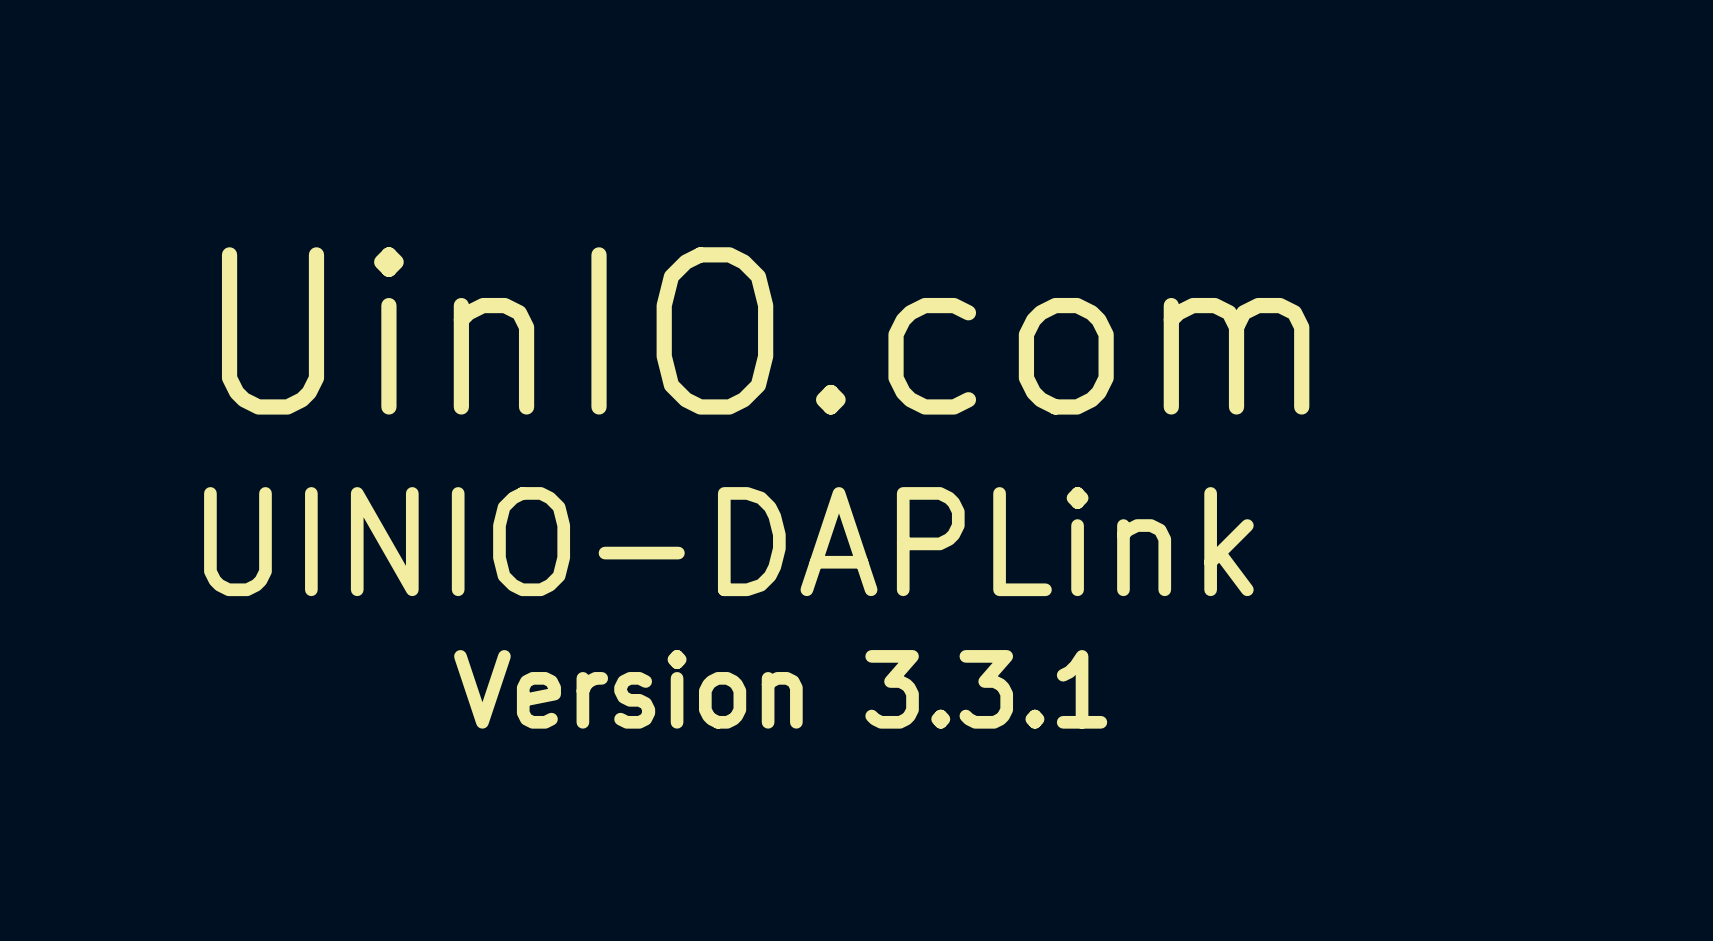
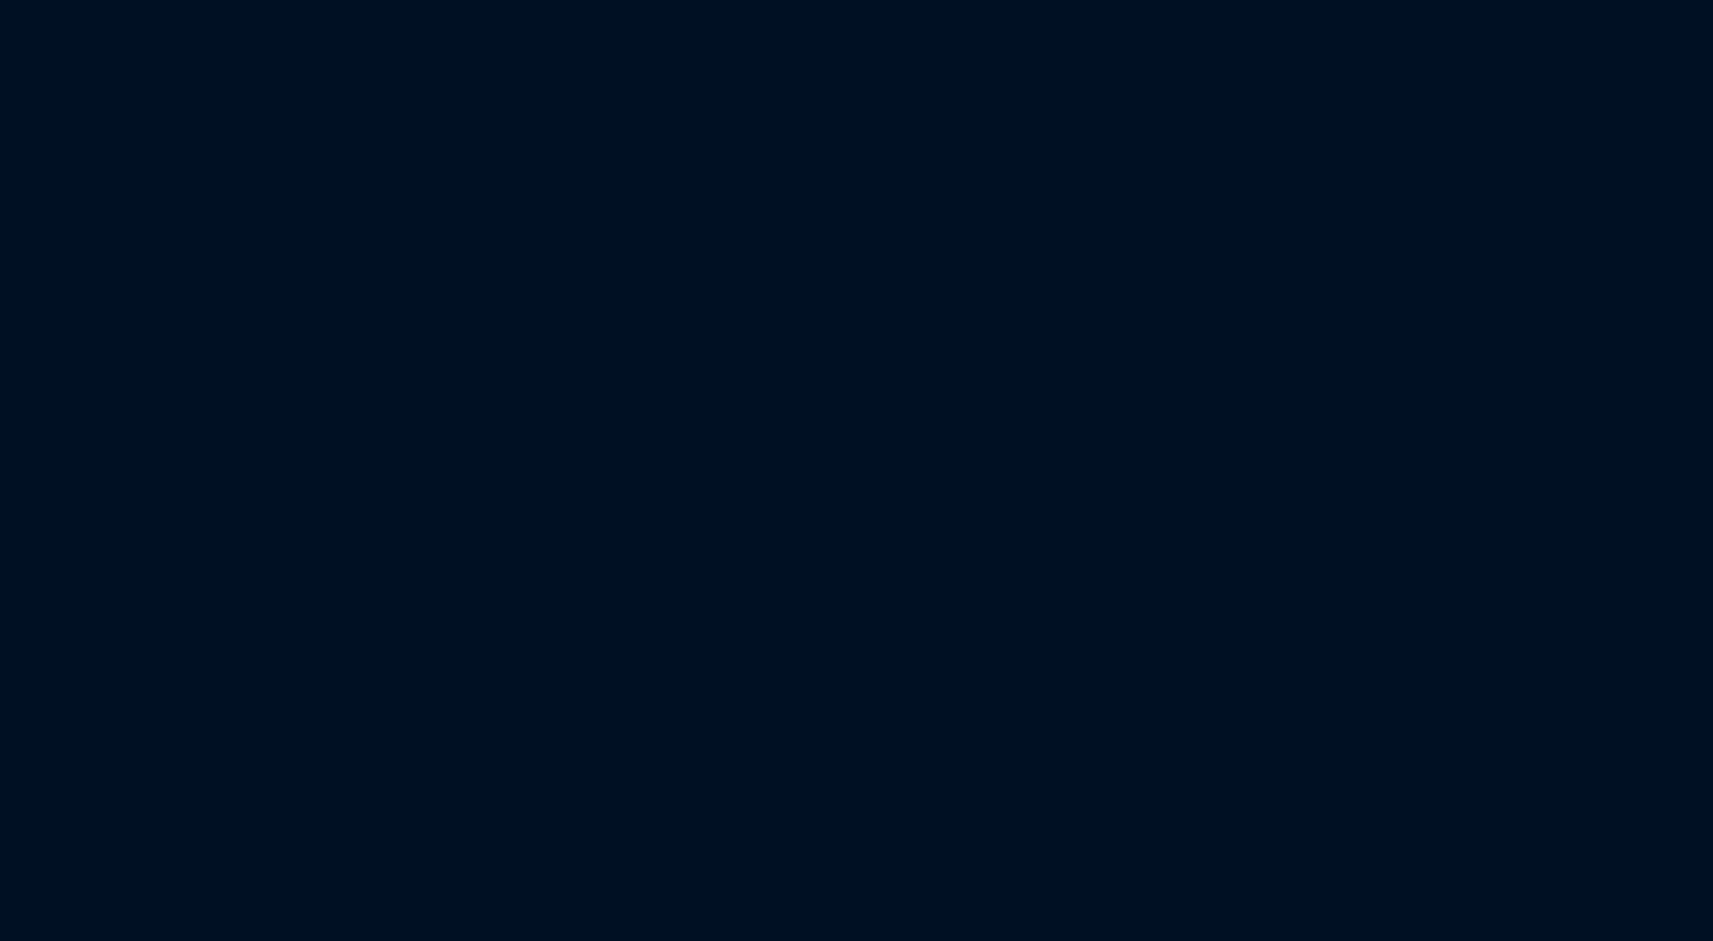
text: UinIO.com (765, 330) -> none
text: UINIO-DAPLink (728, 541) -> none
text: Version 3.3.1 (780, 689) -> none

